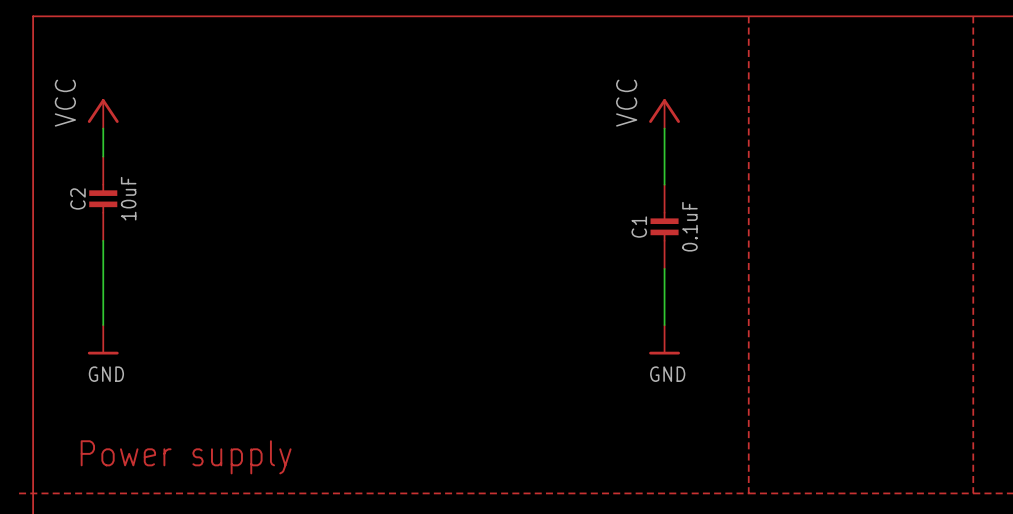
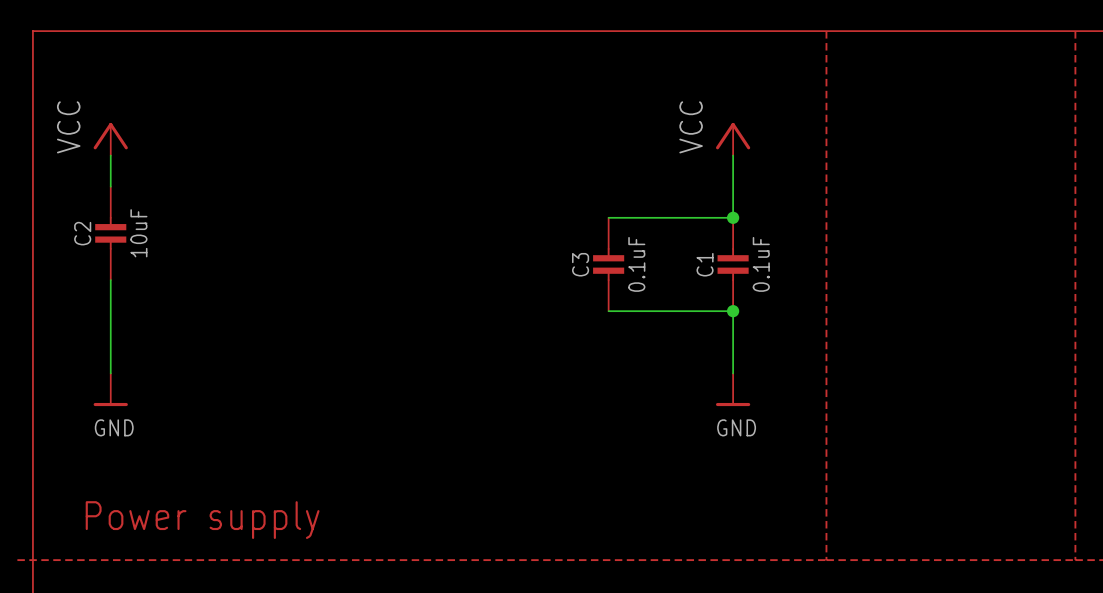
wire: none -> (608, 217) (733, 217)
junction: none -> (733, 217)
C3: none -> 0.1uF (608, 264)
wire: none -> (608, 311) (733, 311)
junction: none -> (733, 311)

